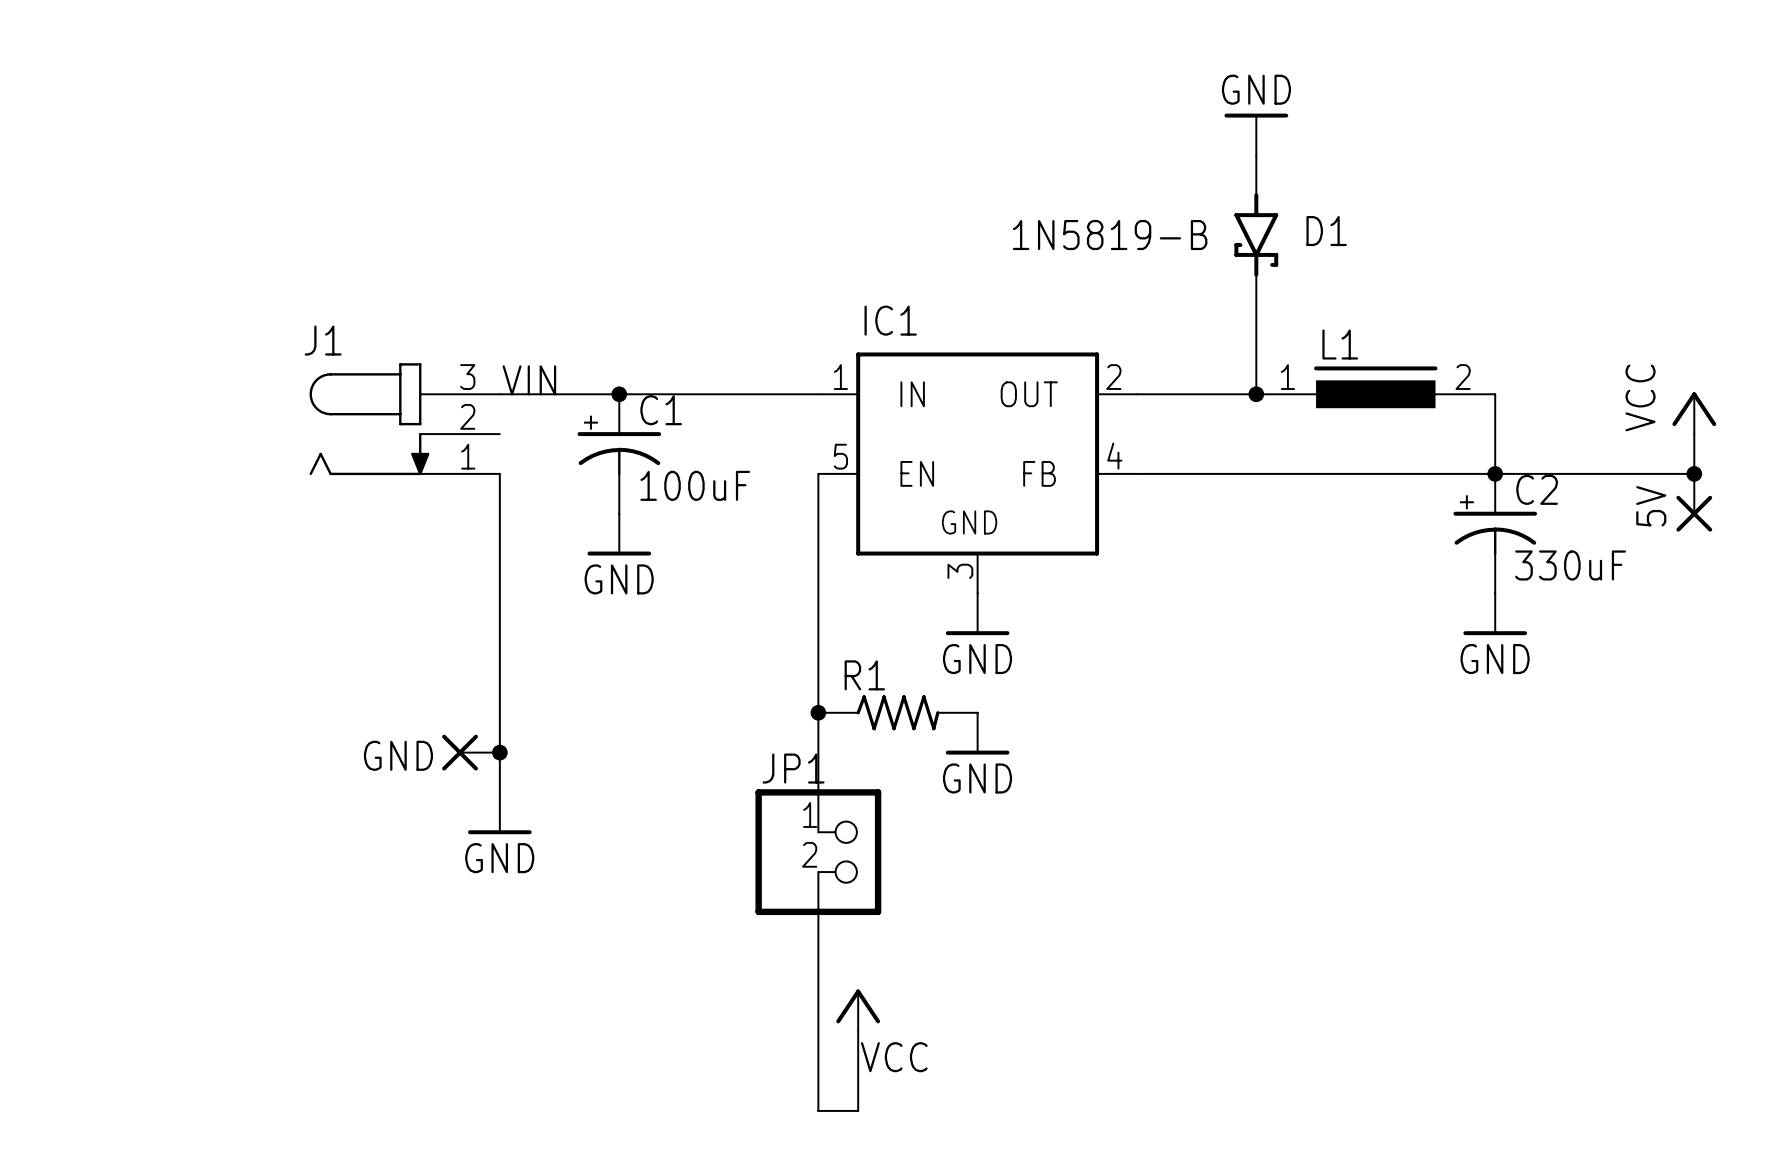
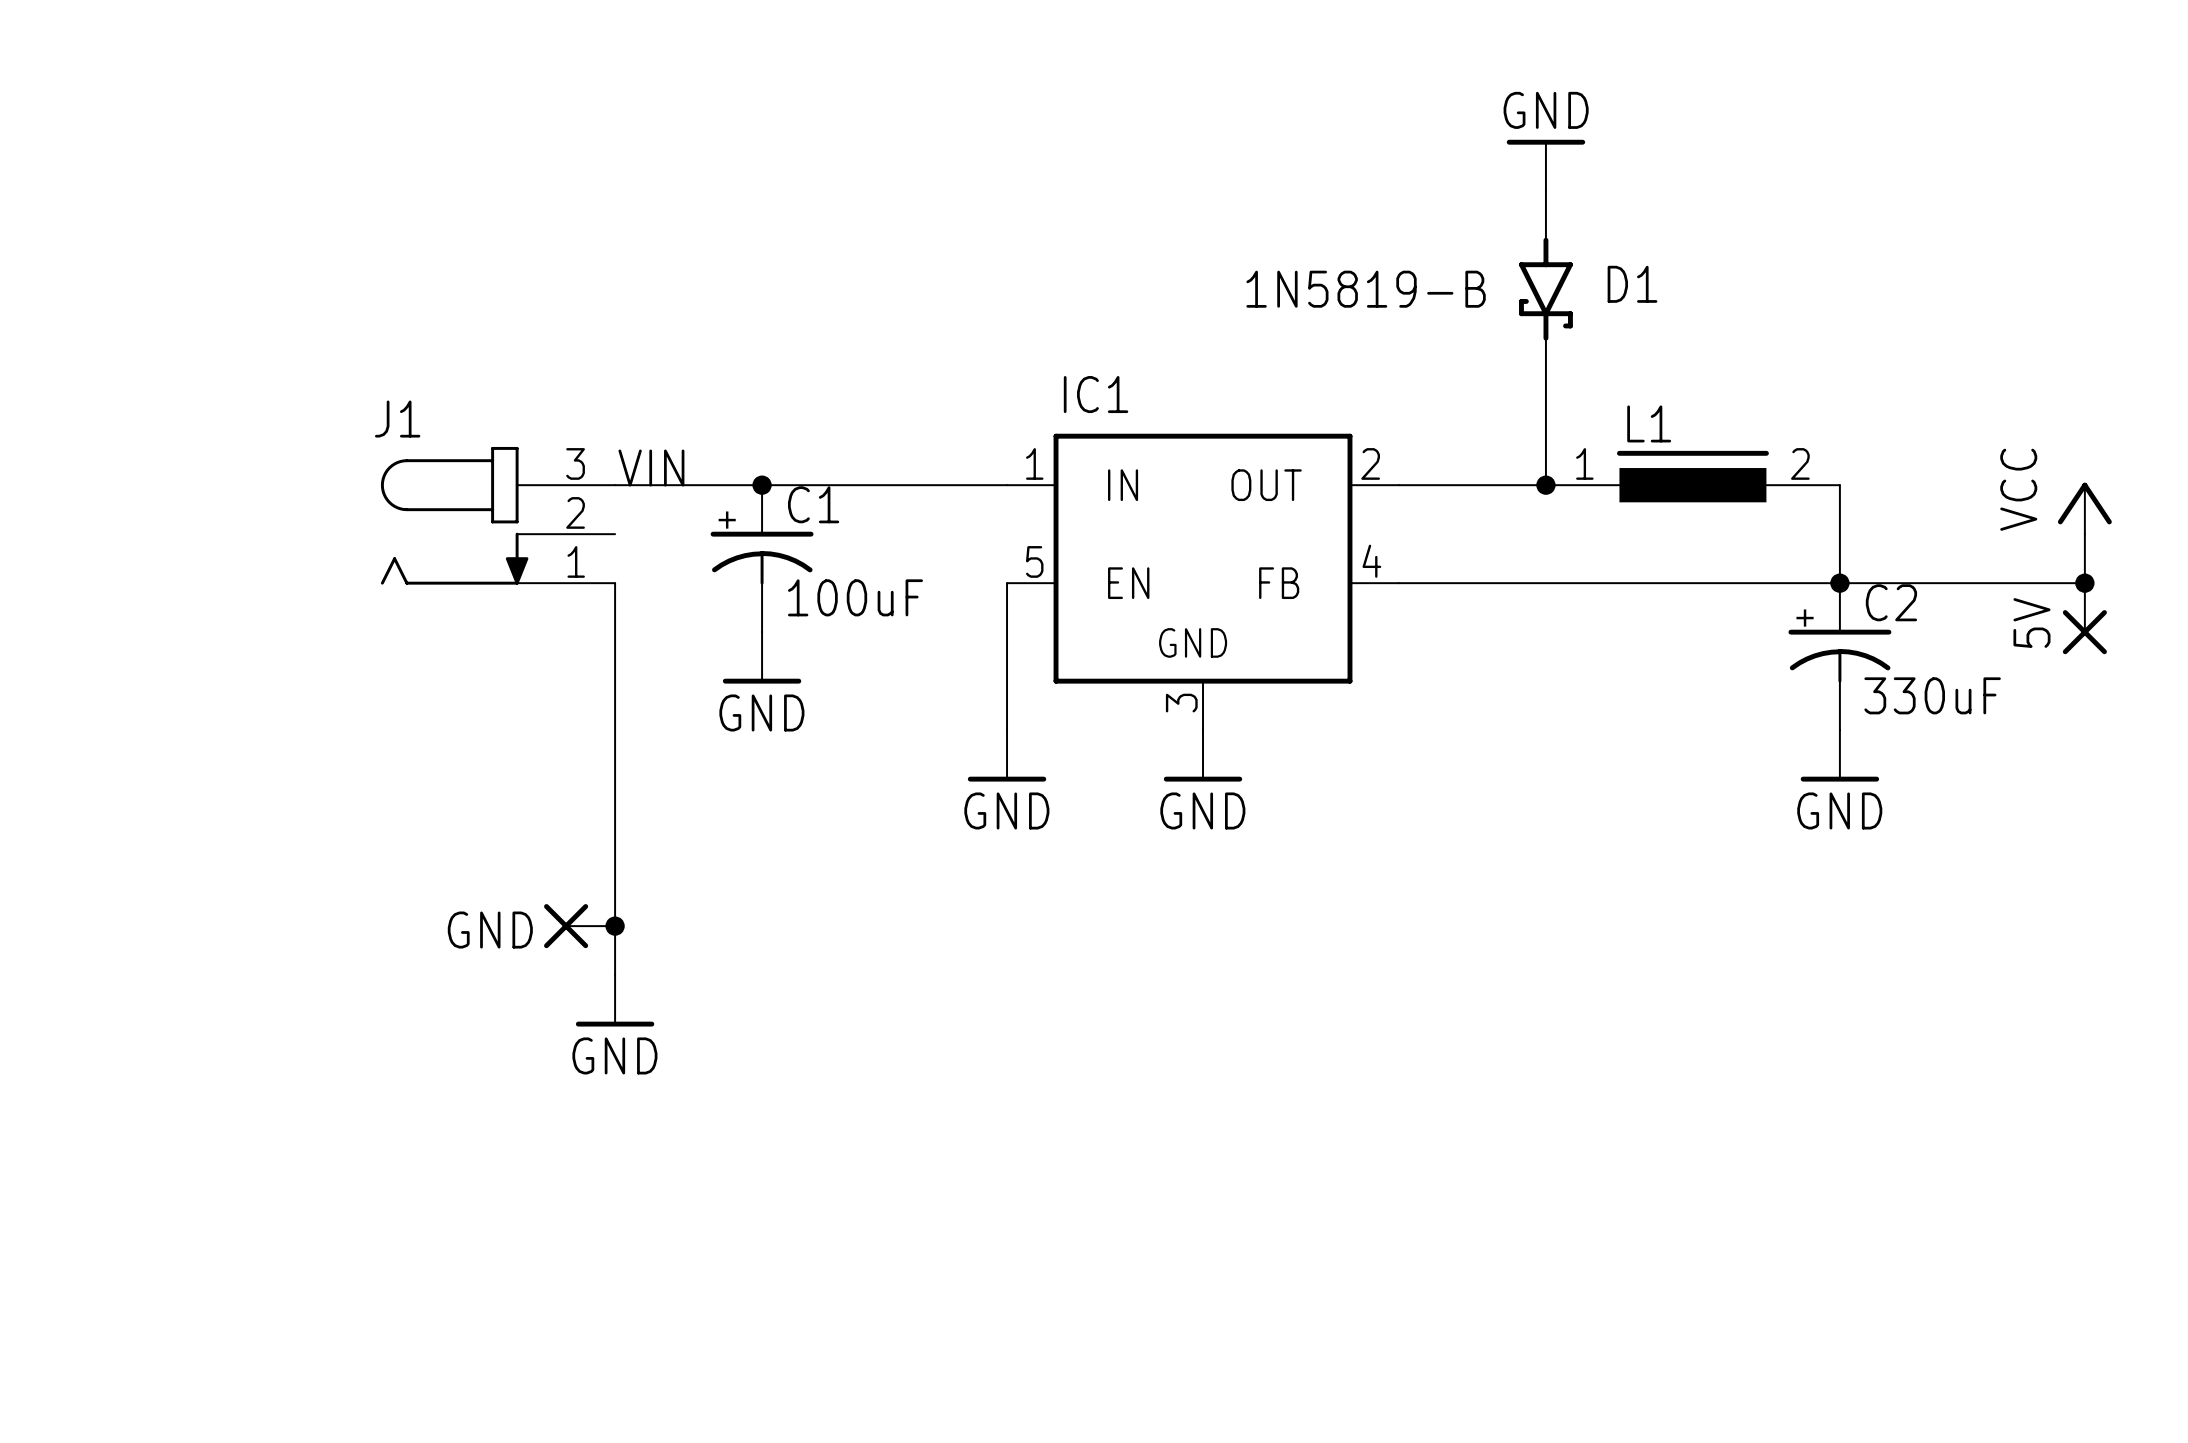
wire: (818, 593) (818, 832) -> none
junction: (818, 712) -> none
R1: (898, 712) -> none
power symbol position: GND (977, 733) -> GND (1007, 755)
JP1: (818, 852) -> none
wire: (818, 872) (818, 1110) (858, 1110) (858, 1031) -> none
power symbol: VCC (858, 1010) -> none

